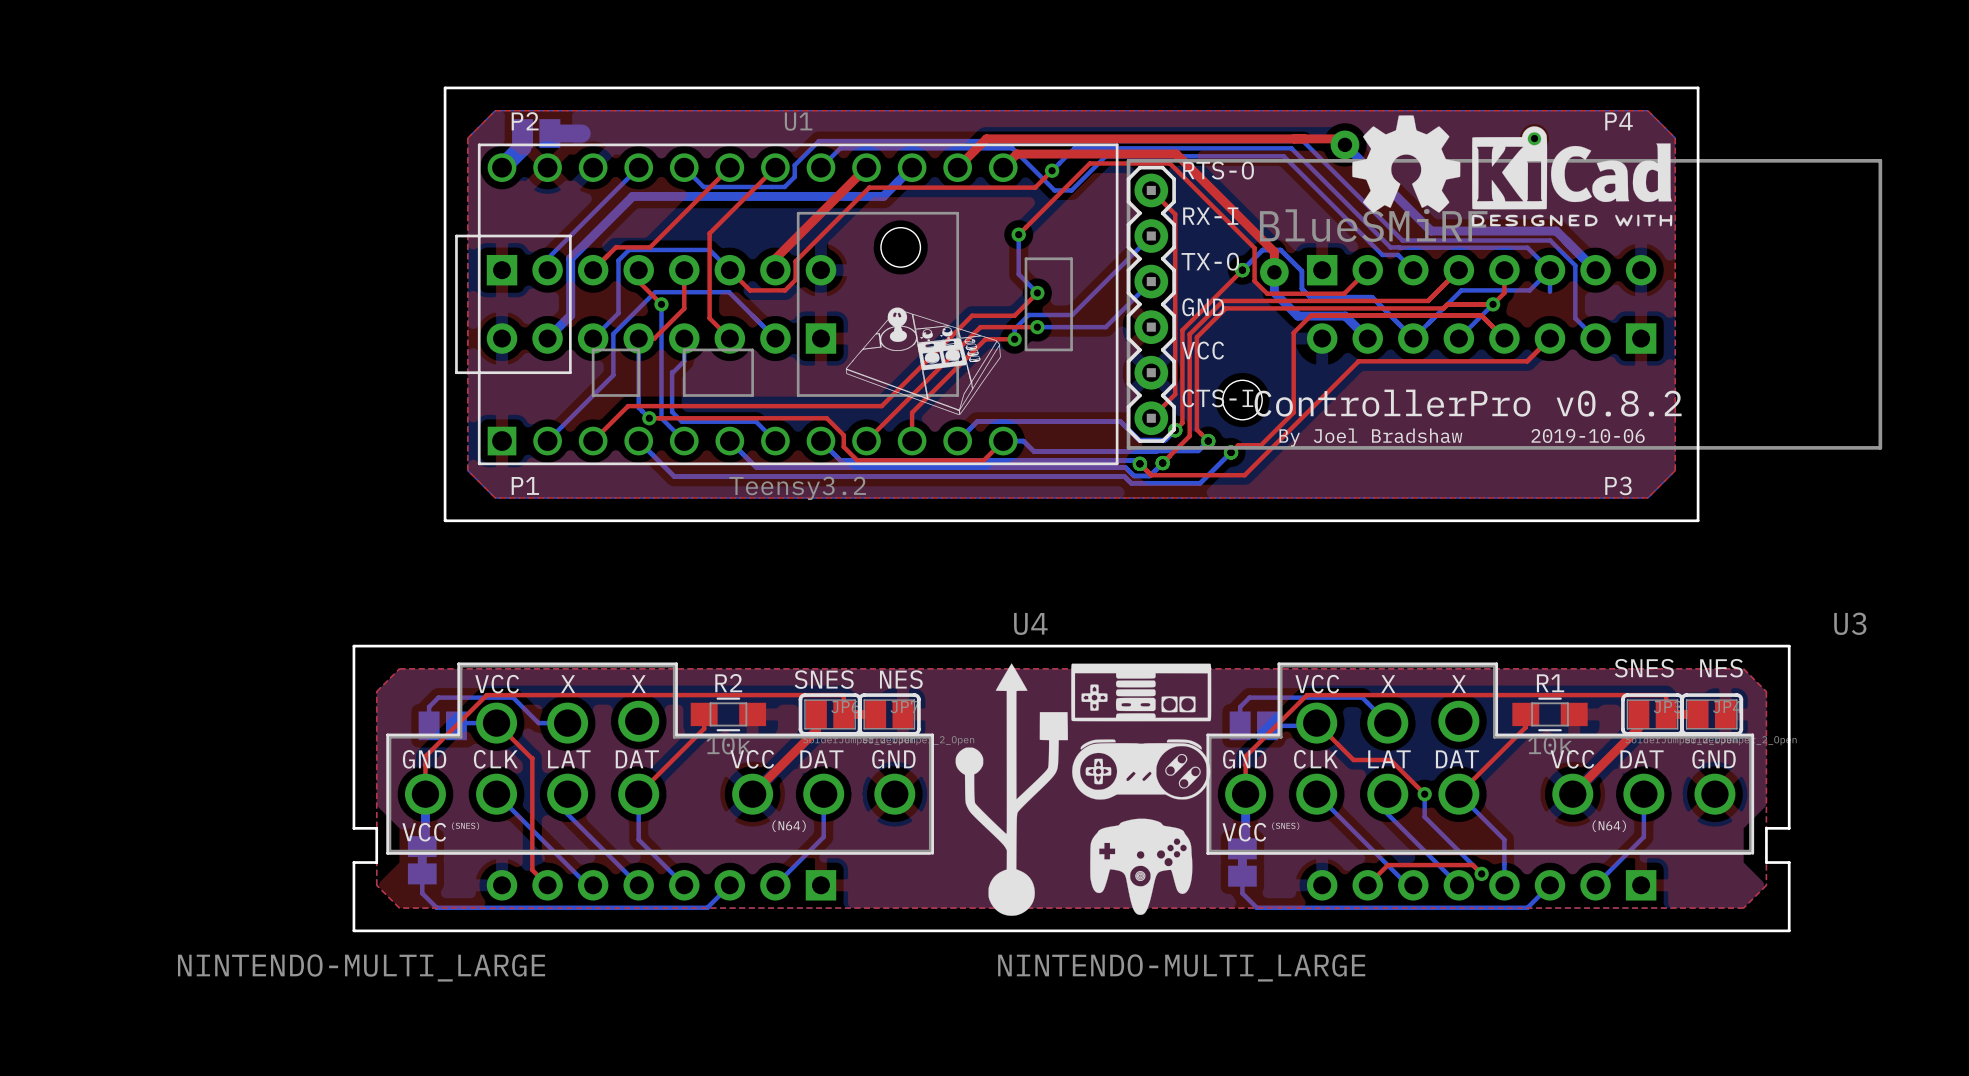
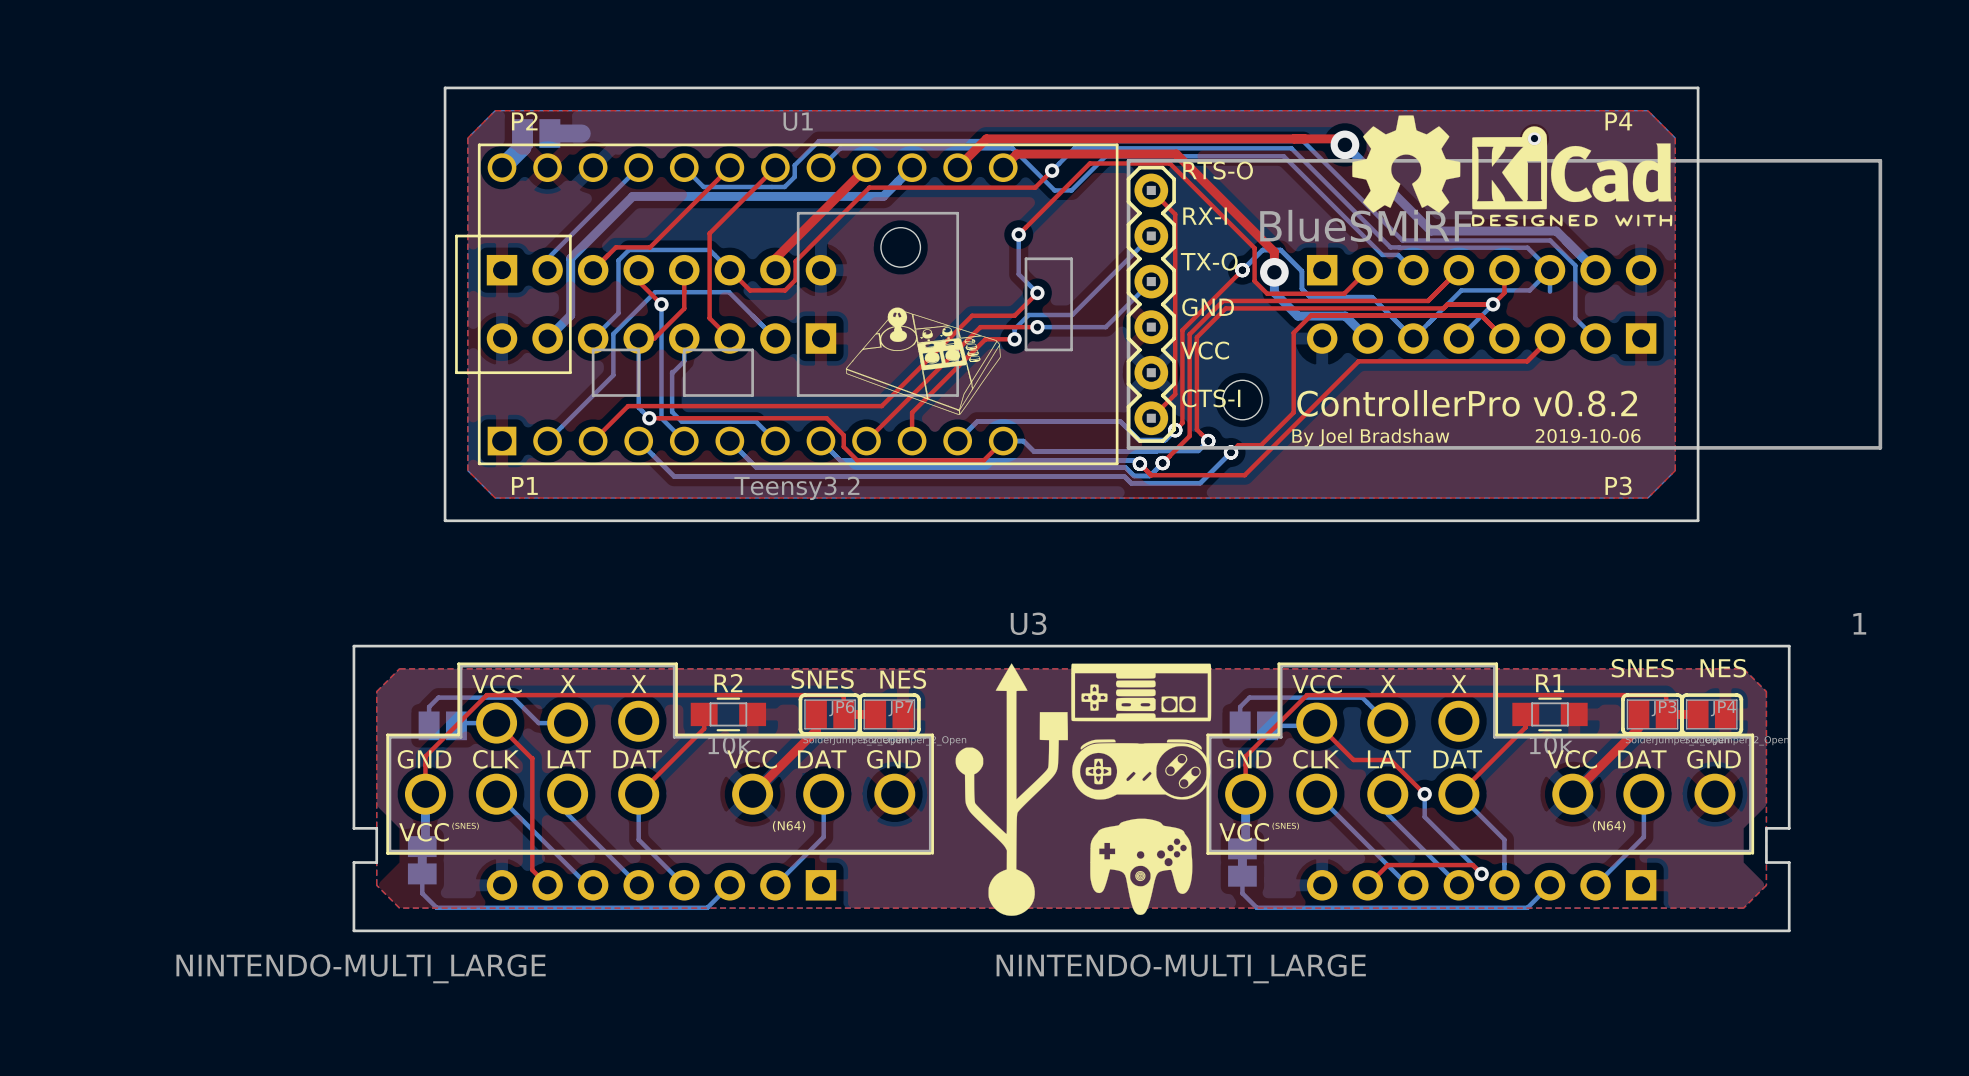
U4 name: U4 (1030, 623) -> U3 (1028, 623)
U3 name: U3 (1850, 623) -> 1 (1859, 623)

